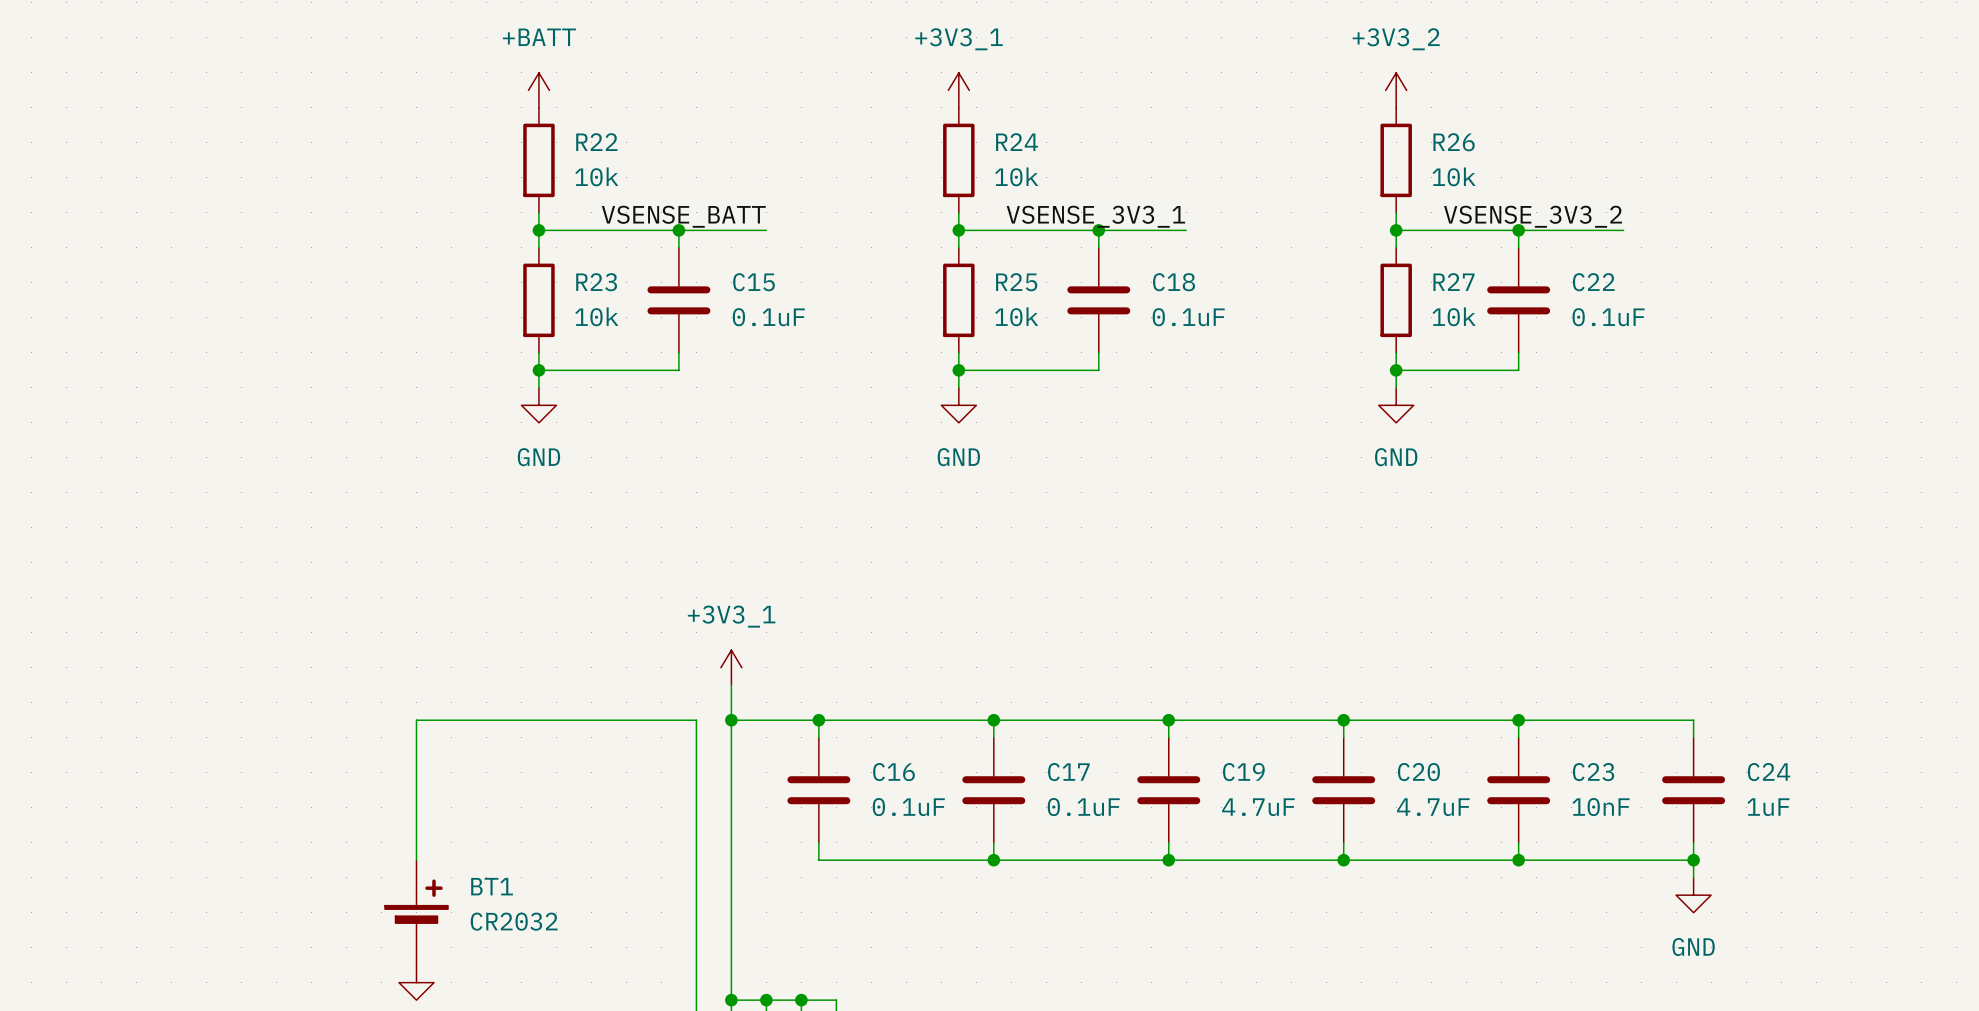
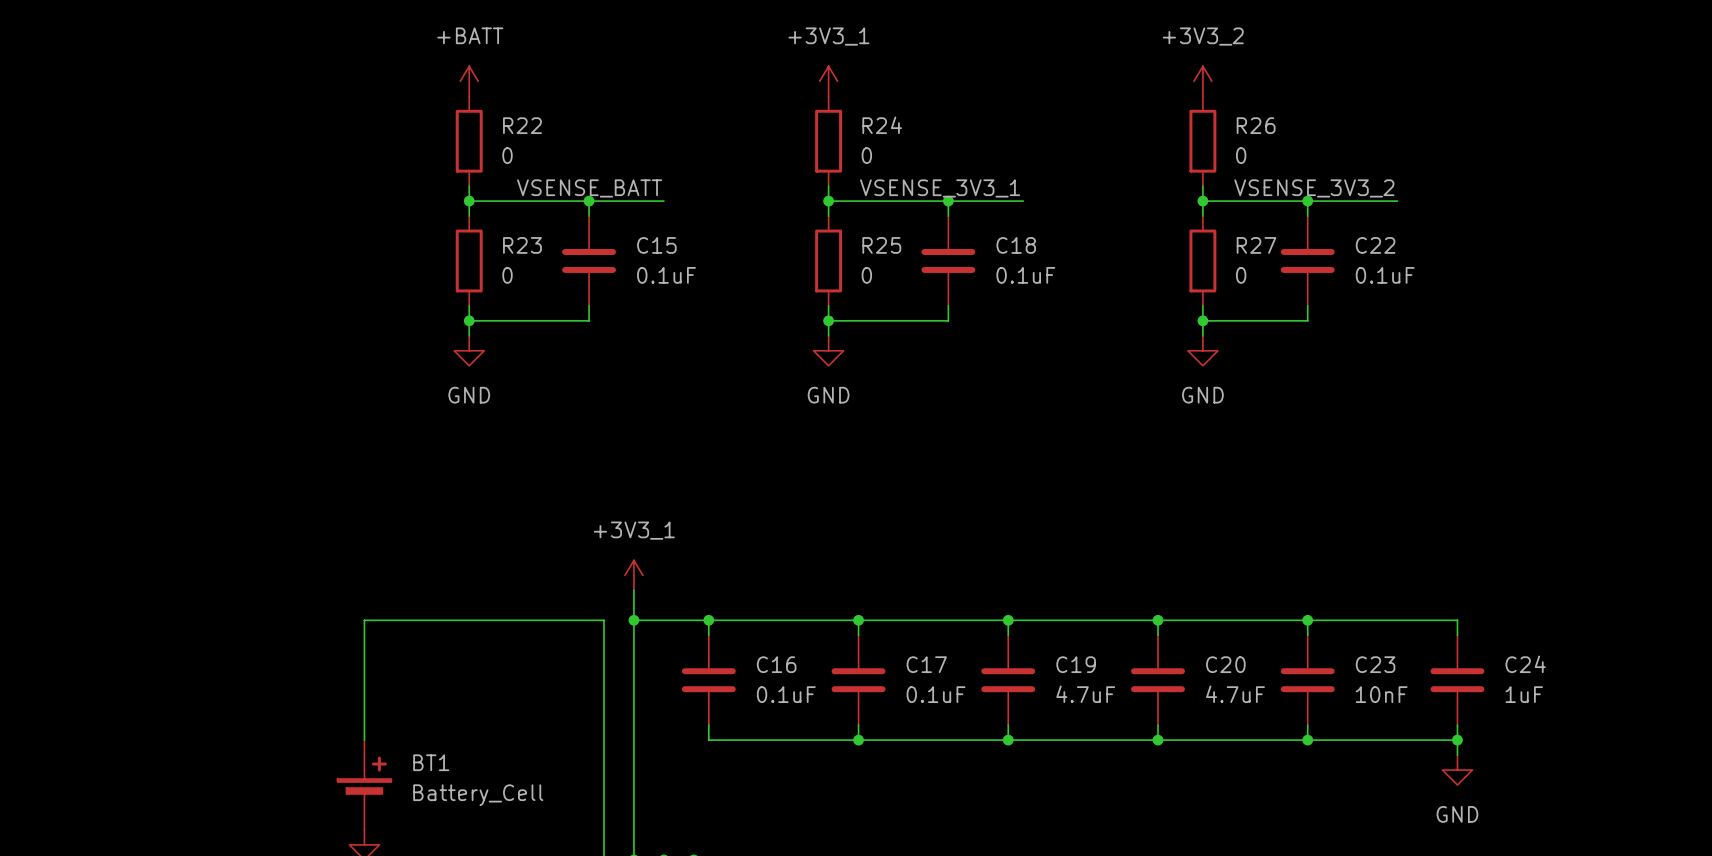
R22 value: 10k (596, 176) -> 0 (507, 155)
R24 value: 10k (1016, 176) -> 0 (866, 155)
R26 value: 10k (1454, 176) -> 0 (1241, 155)
R23 value: 10k (596, 316) -> 0 (507, 275)
R25 value: 10k (1016, 316) -> 0 (866, 275)
R27 value: 10k (1454, 316) -> 0 (1241, 275)
BT1 value: CR2032 (514, 921) -> Battery_Cell (478, 795)

